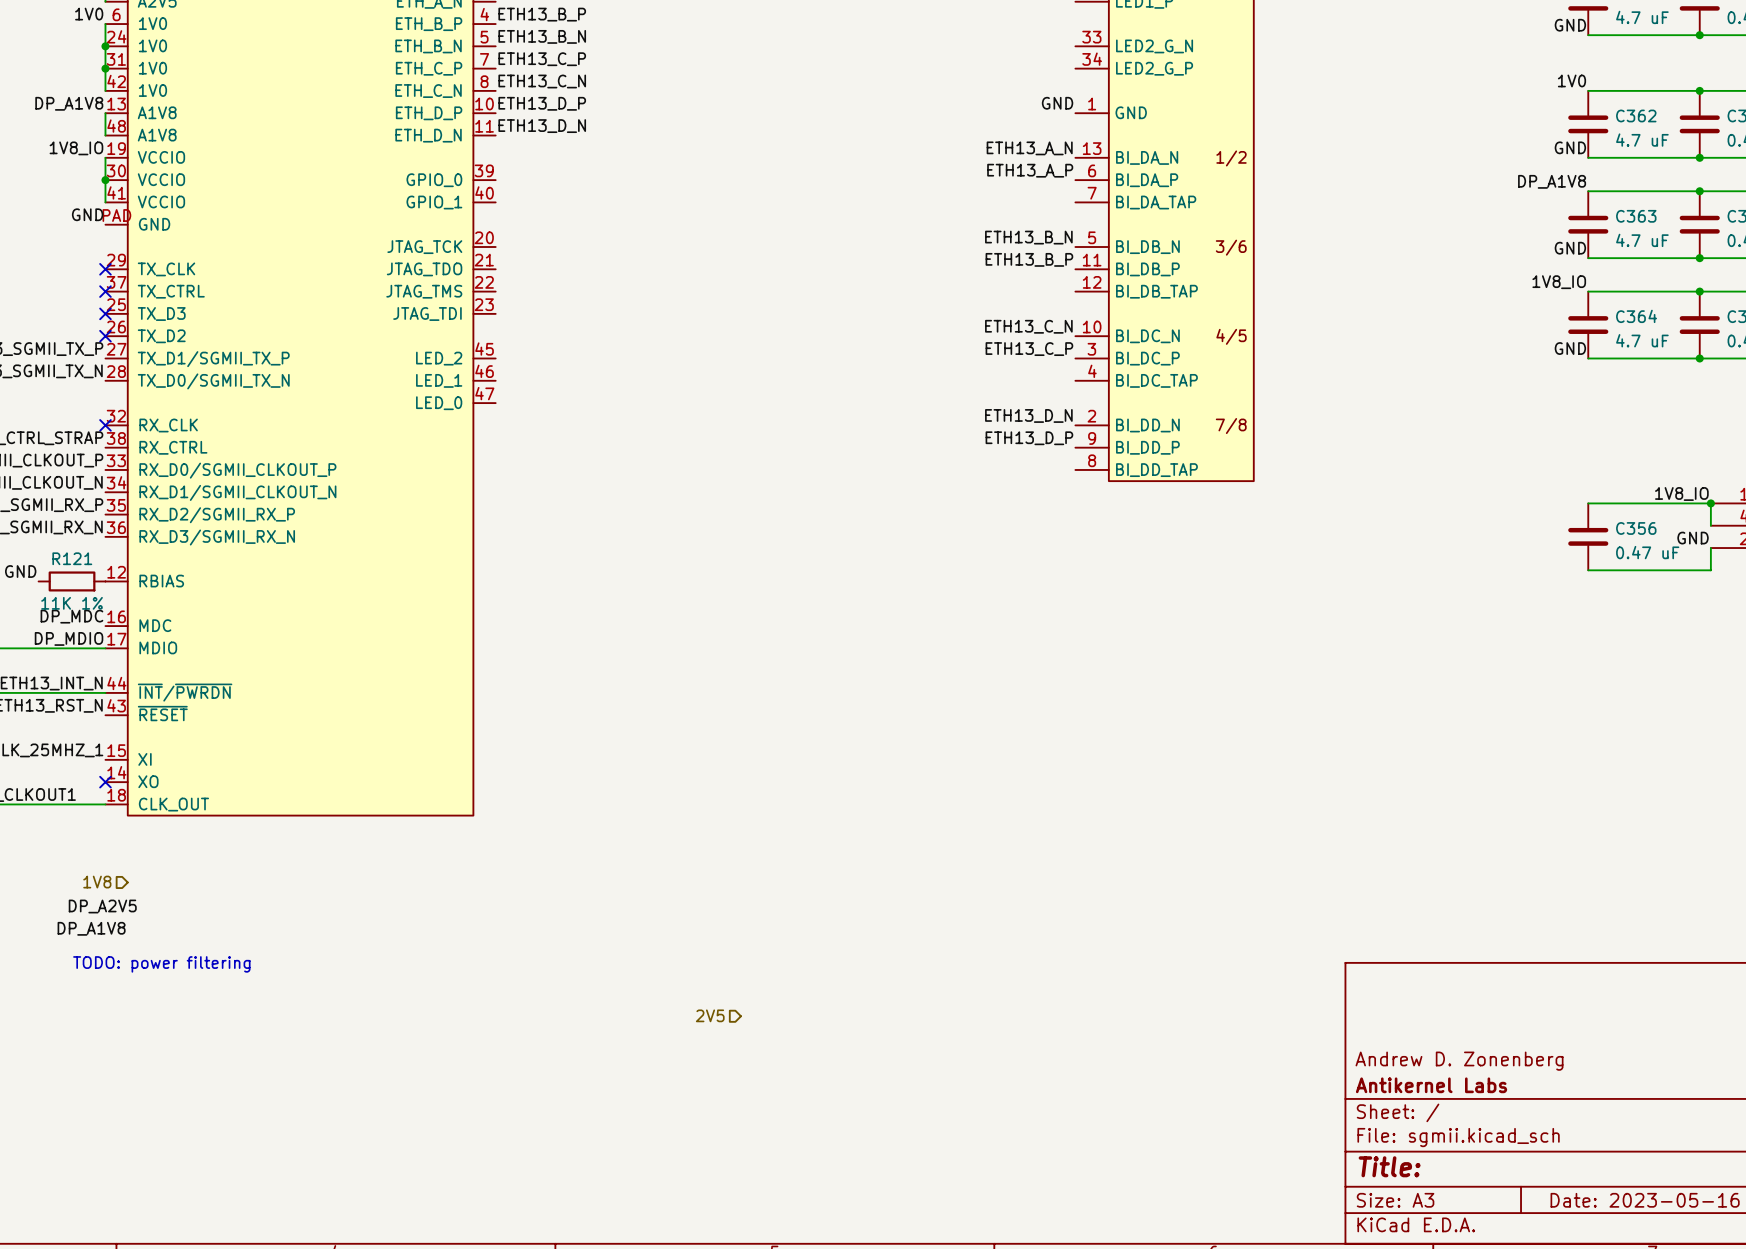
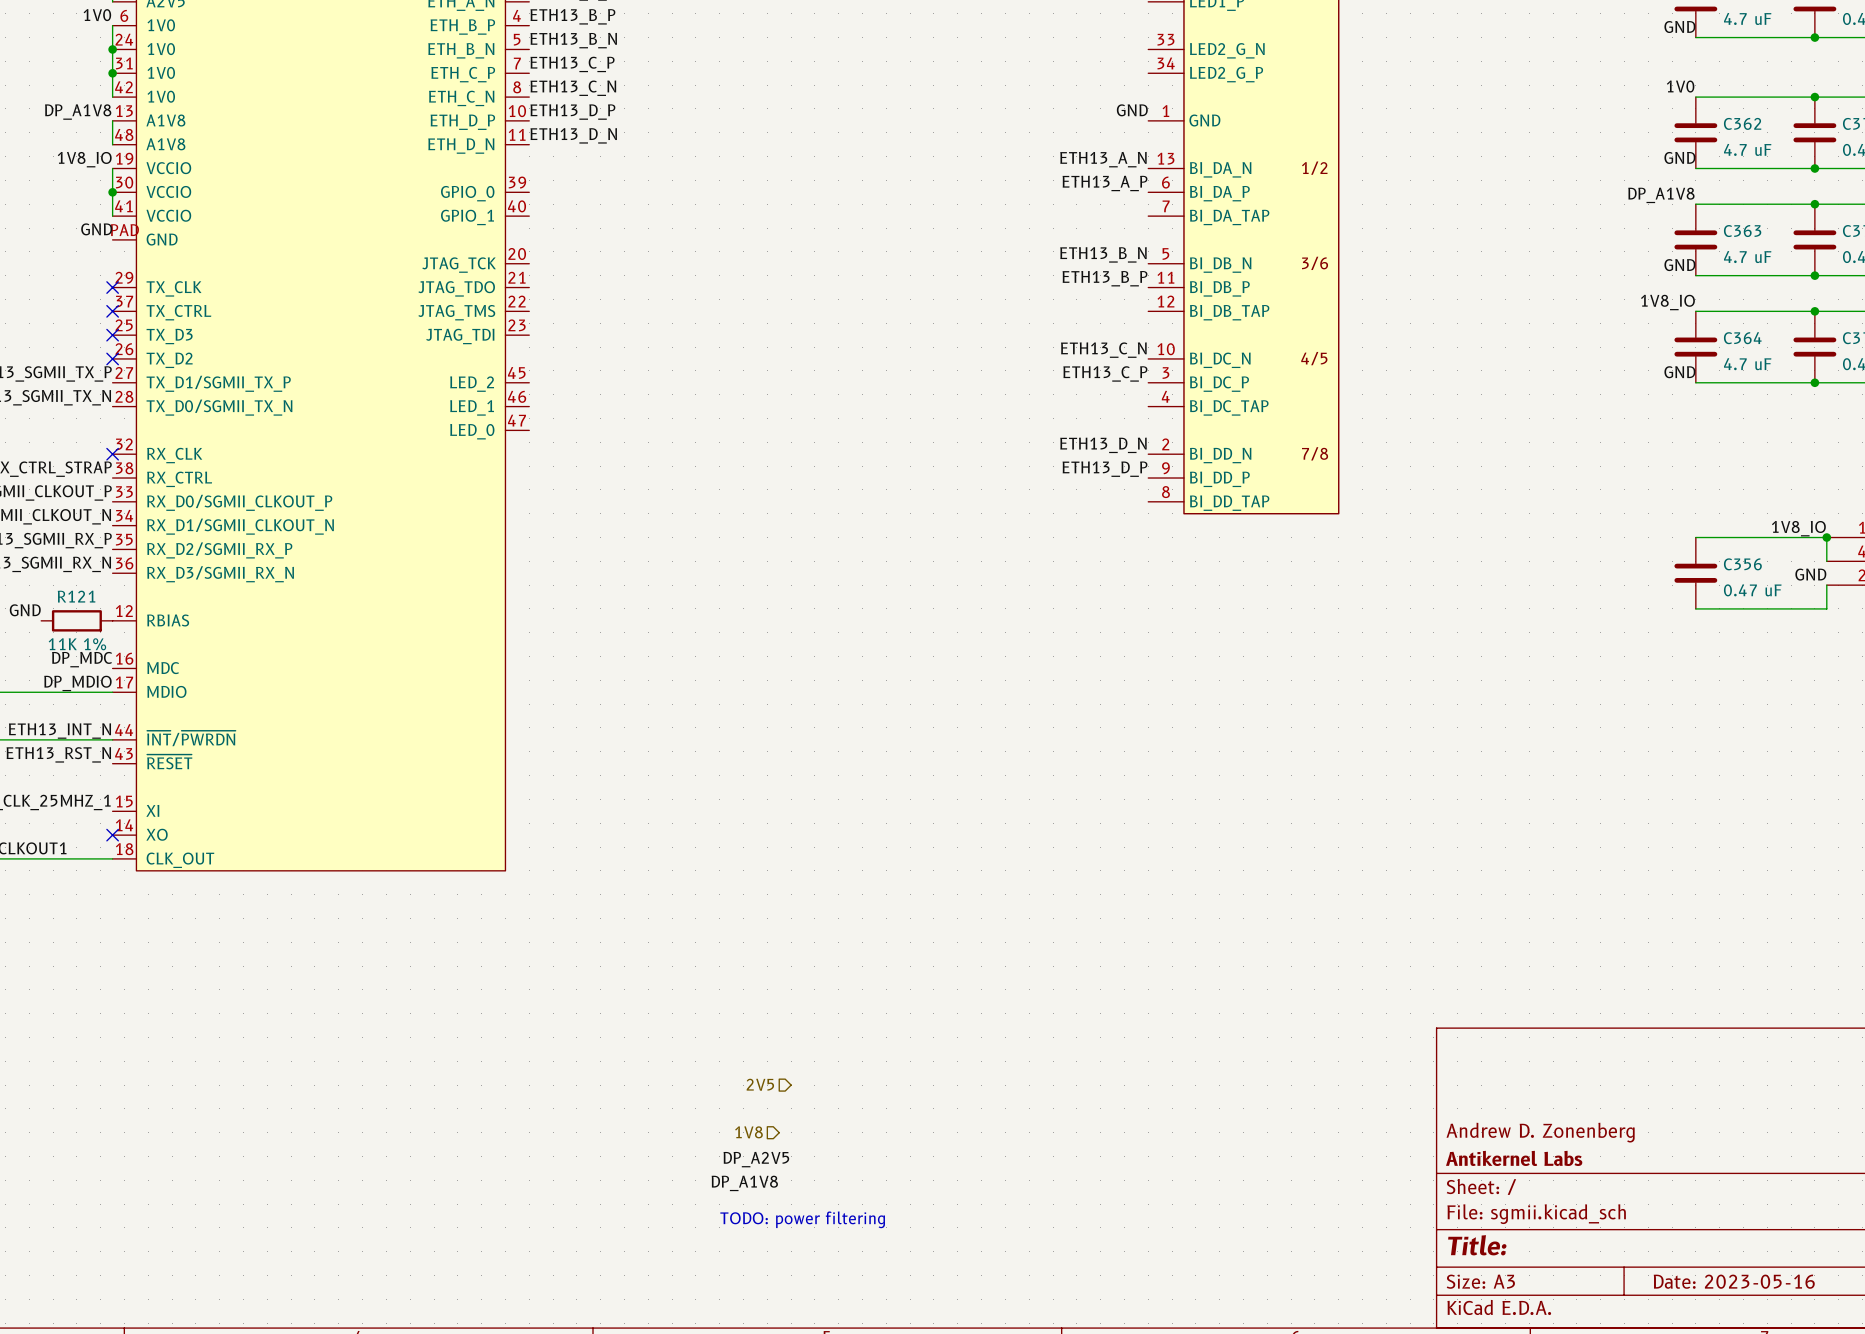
hierarchical label: 1V8 (97, 882) -> none
label: DP_A2V5 (102, 906) -> none
label: DP_A1V8 (91, 928) -> none
text: TODO: power filtering (161, 964) -> none
hierarchical label: none -> 1V8 (748, 1132)
label: none -> DP_A2V5 (756, 1159)
label: none -> DP_A1V8 (744, 1183)
text: none -> TODO: power filtering (802, 1219)

